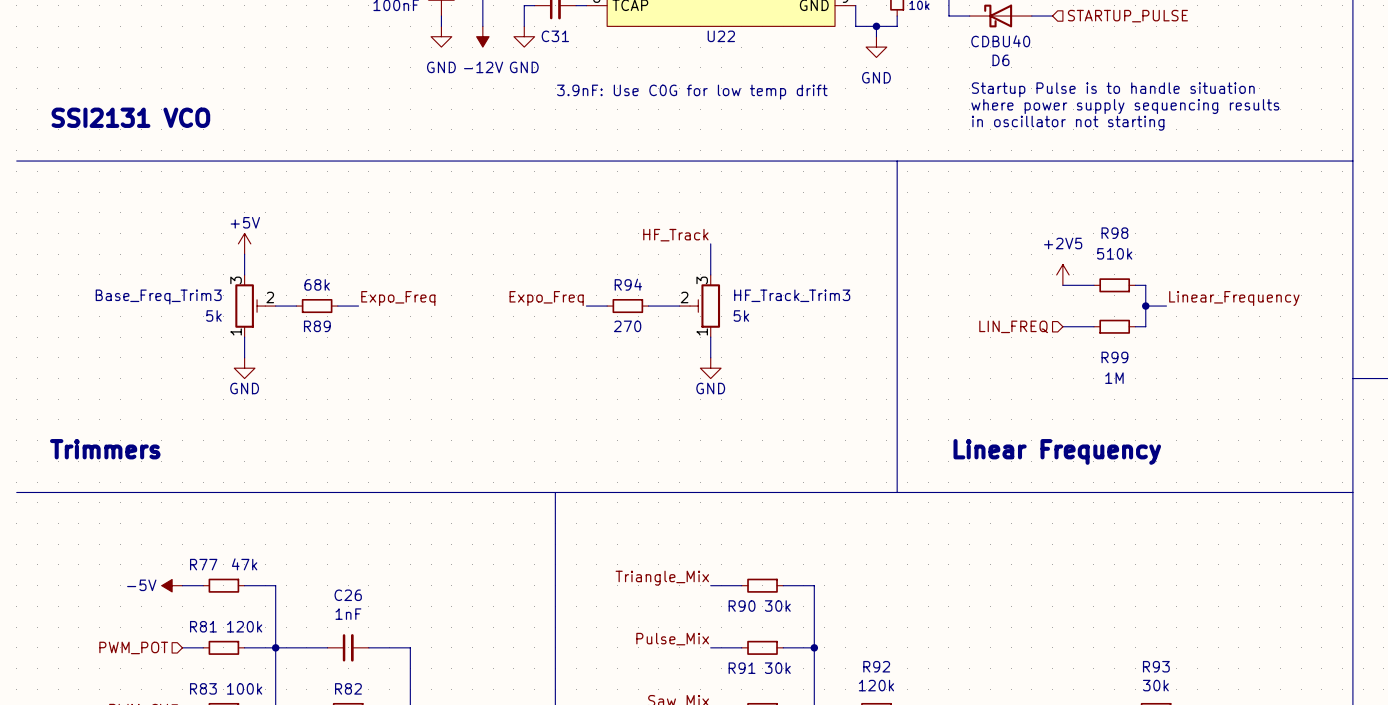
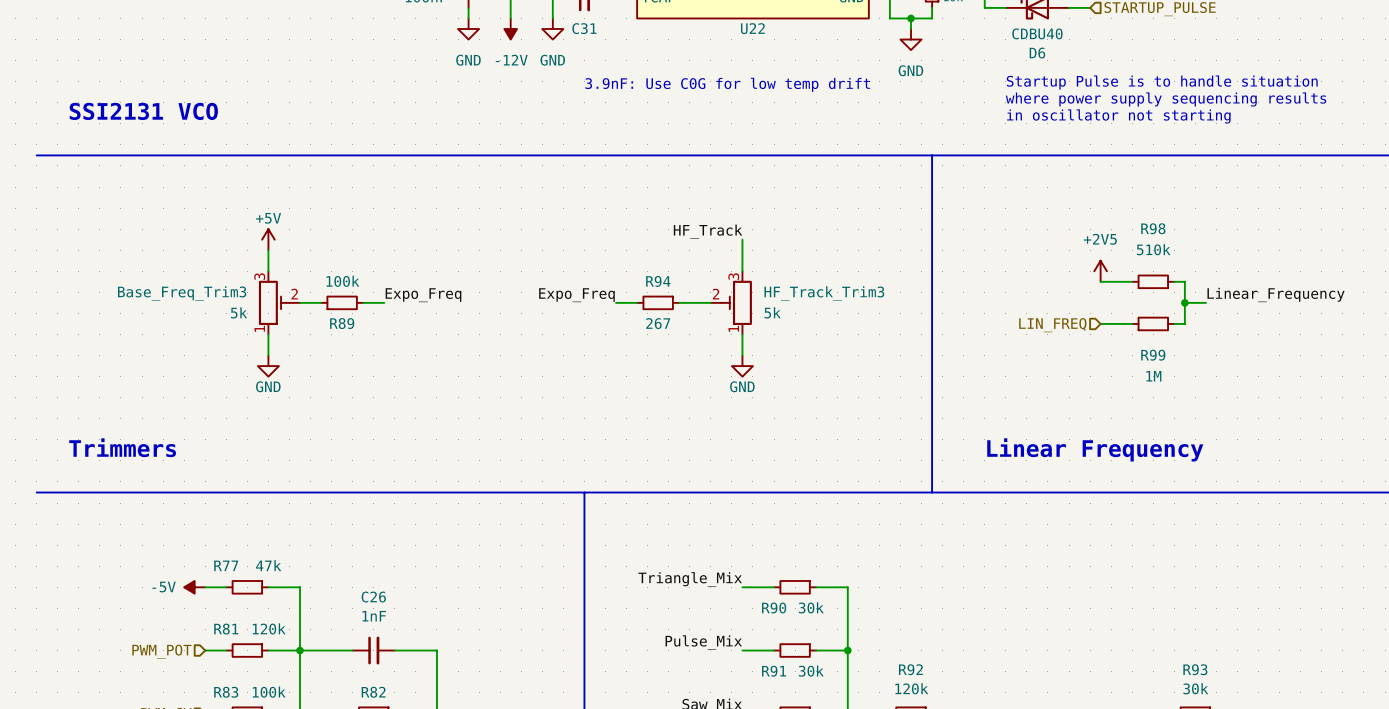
R89 value: 68k (317, 284) -> 100k (342, 281)
R94 value: 270 (627, 326) -> 267 (658, 323)

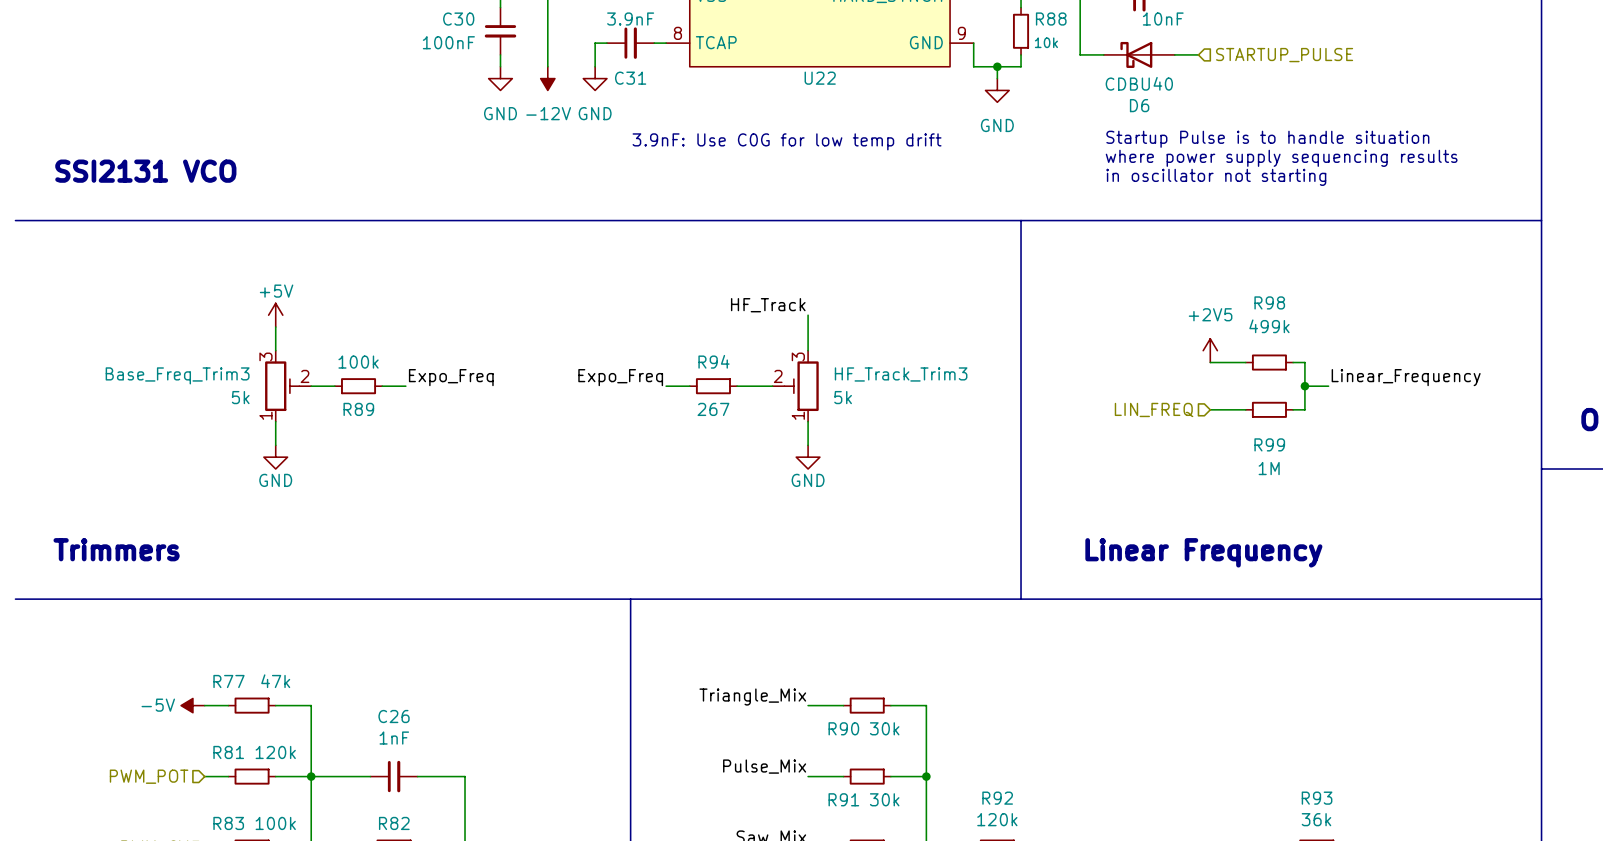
R98 value: 510k (1153, 249) -> 499k (1269, 326)
R93 value: 30k (1195, 688) -> 36k (1316, 819)

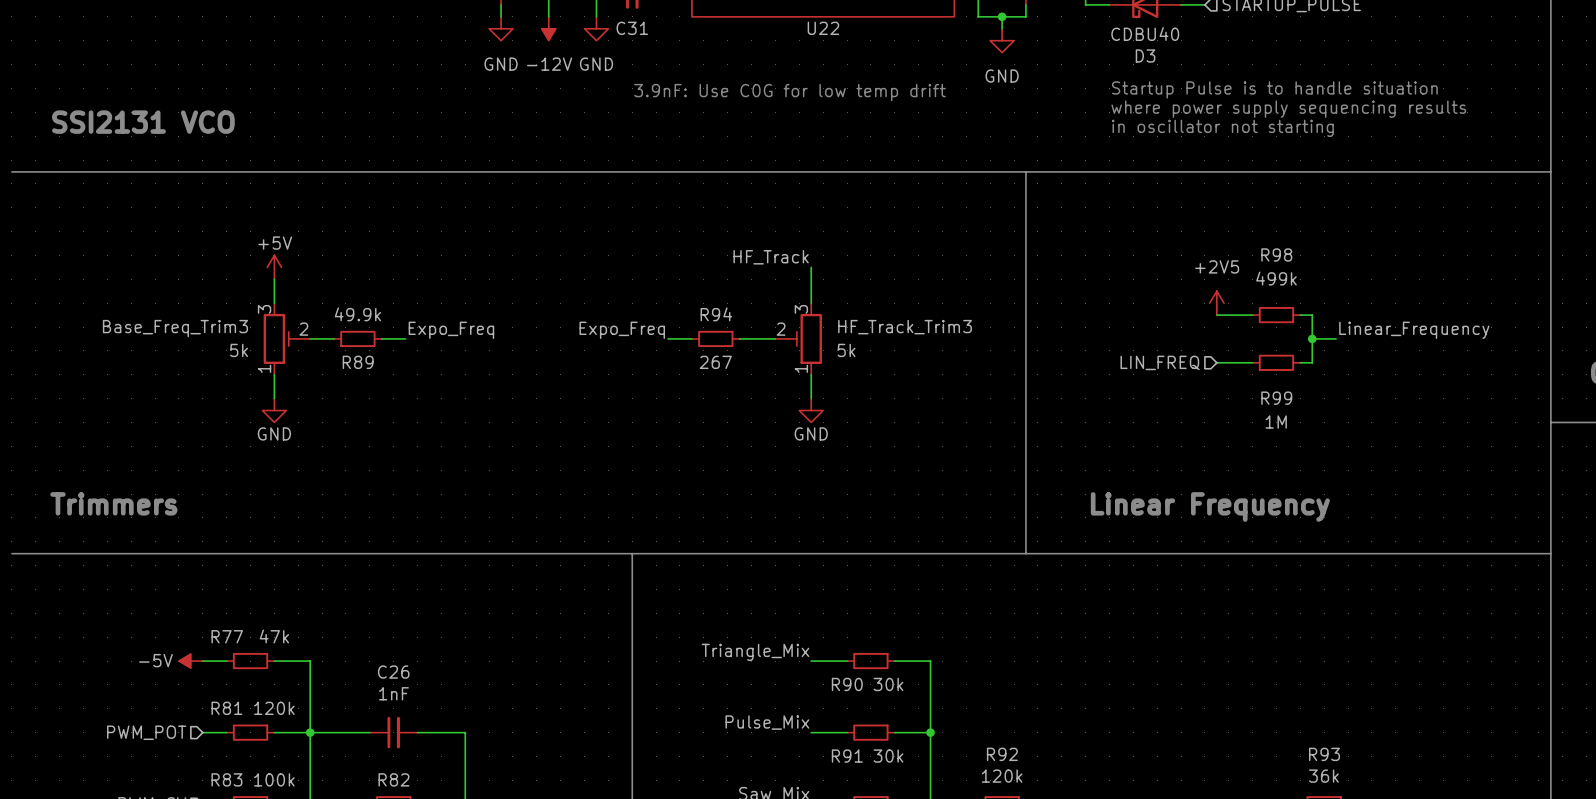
D6 name: D6 (1139, 105) -> D3 (1145, 56)
R89 value: 100k (358, 362) -> 49.9k (357, 314)

